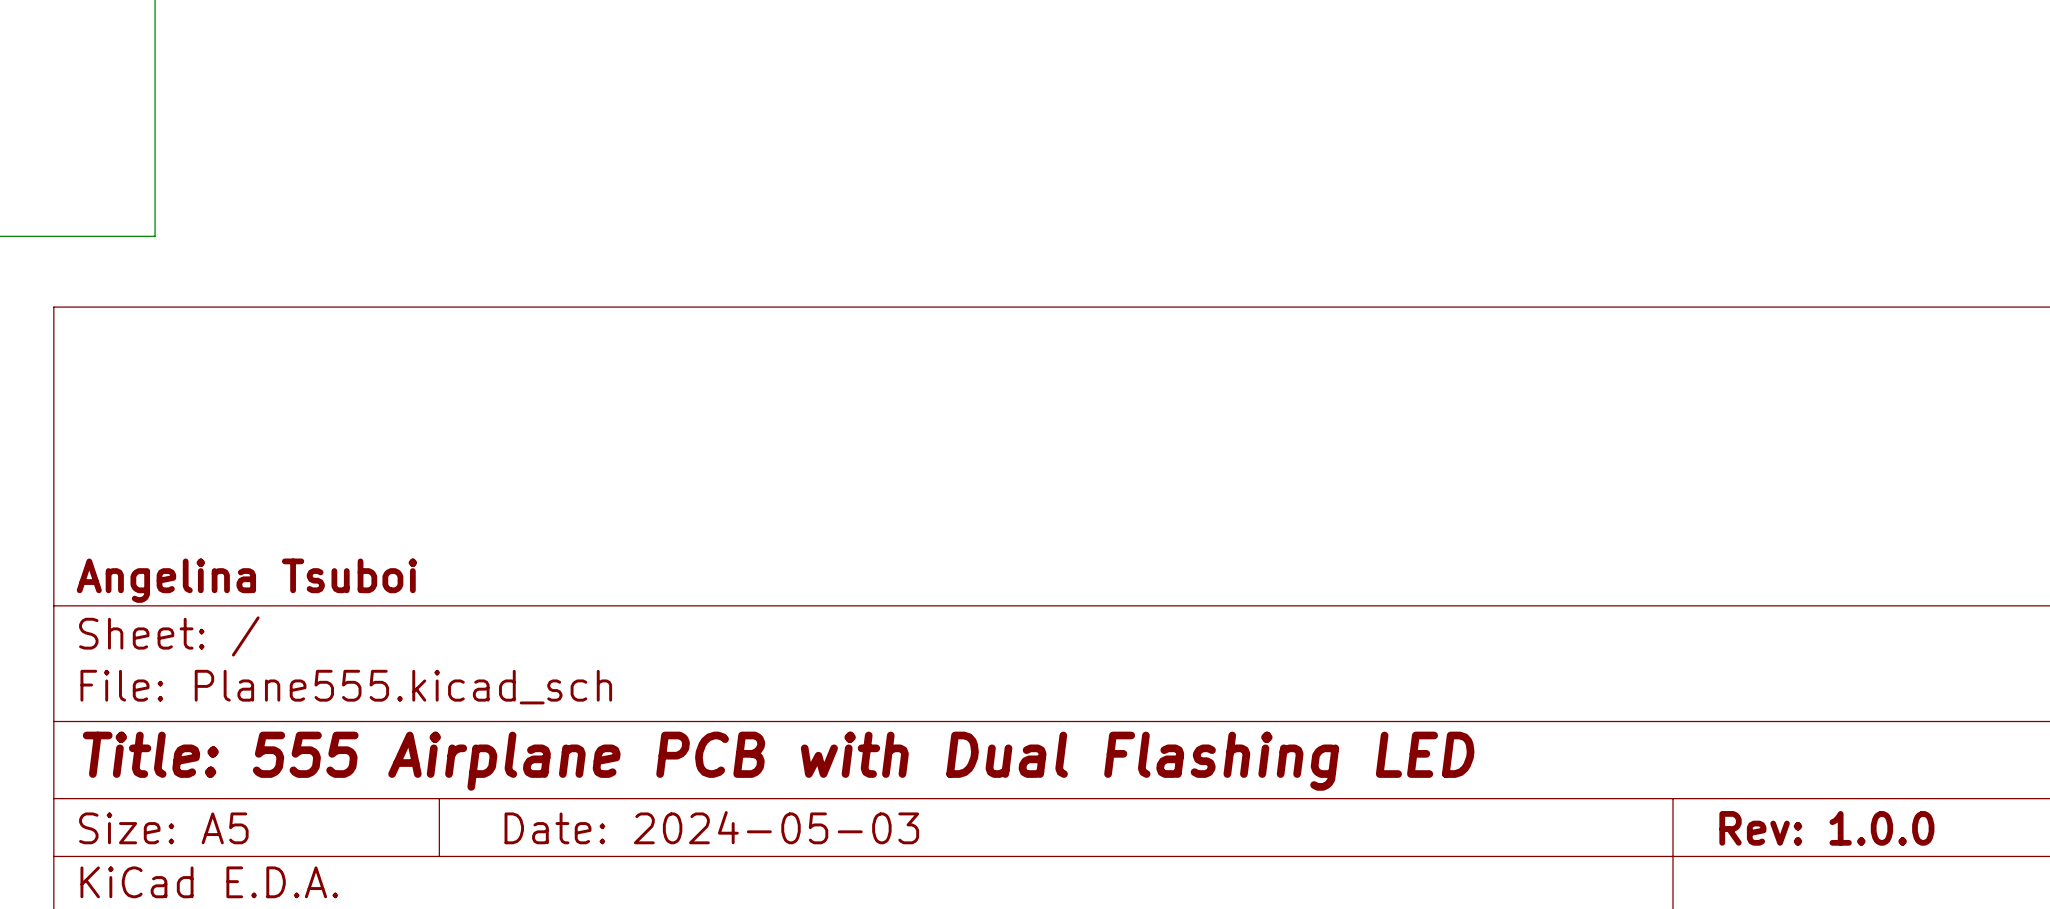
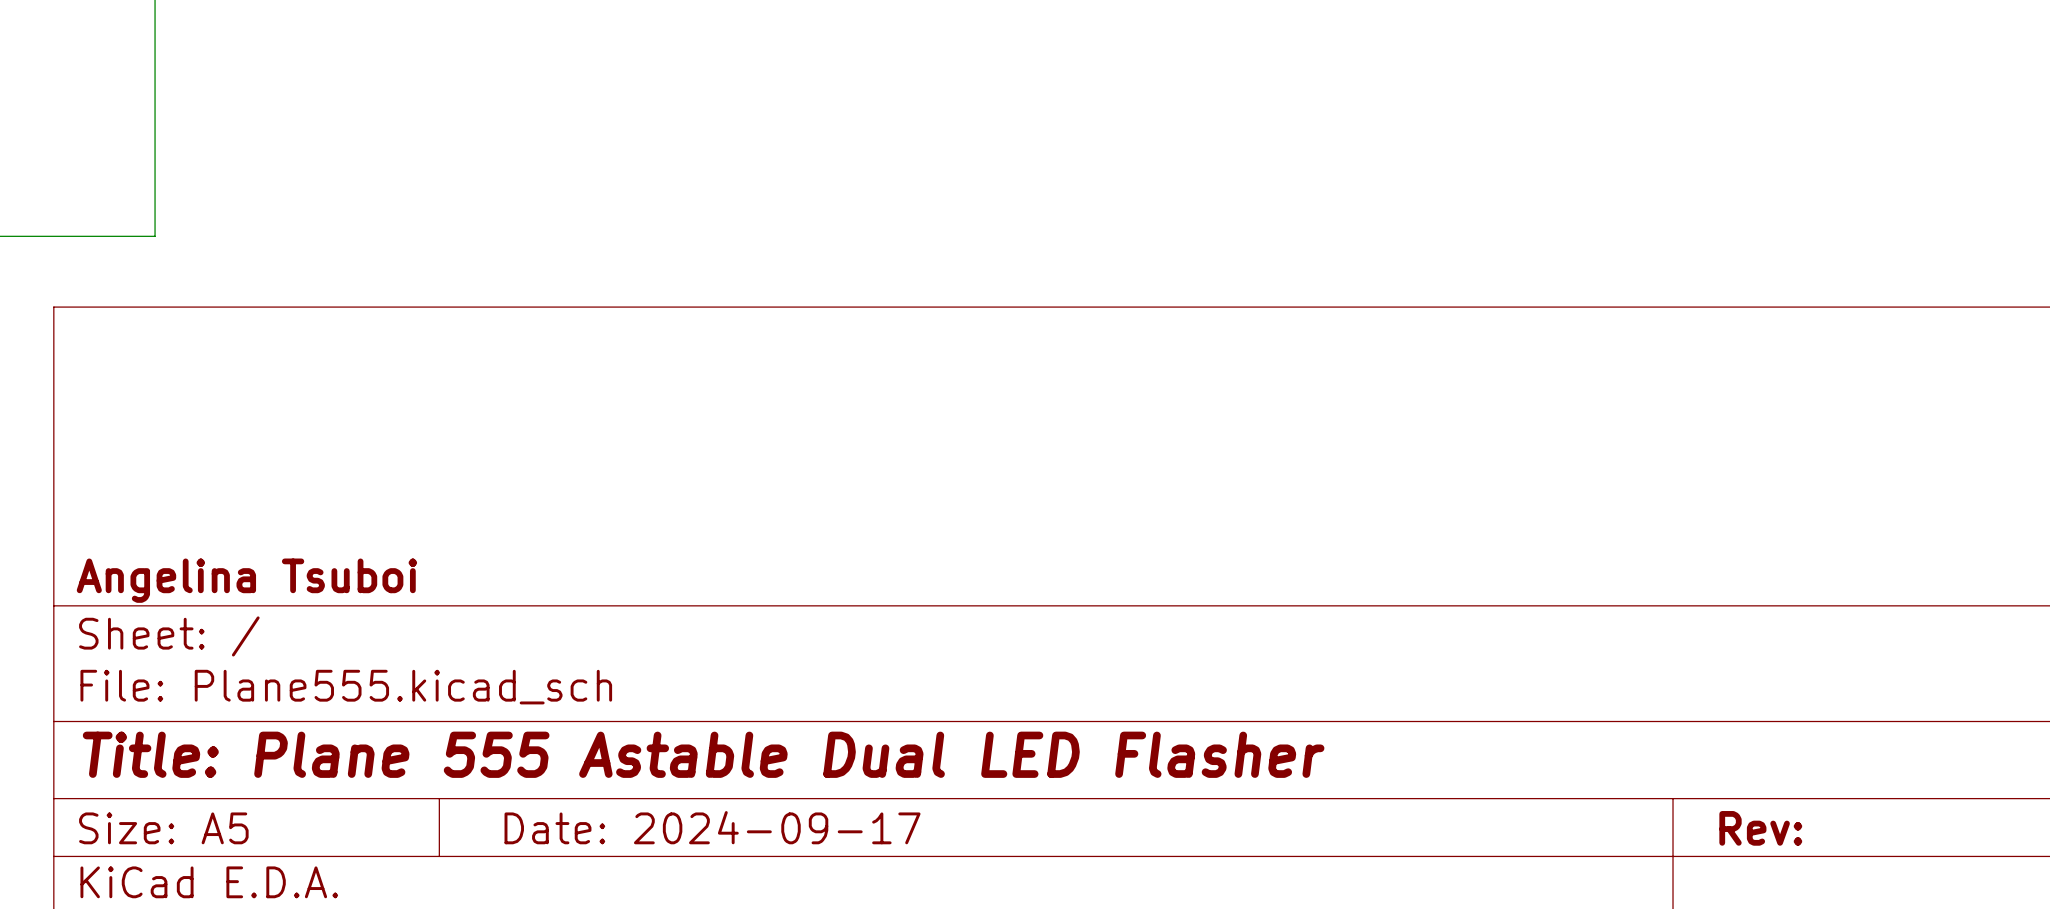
title block: Title: 555 Airplane PCB with Dual Flashing LED (778, 761) -> Title: Plane 555 Astable Dual LED Flasher (703, 754)
title block: Date: 2024-05-03 (711, 827) -> Date: 2024-09-17 (712, 827)
title block: Rev: 1.0.0 (1826, 828) -> Rev: (1760, 828)

